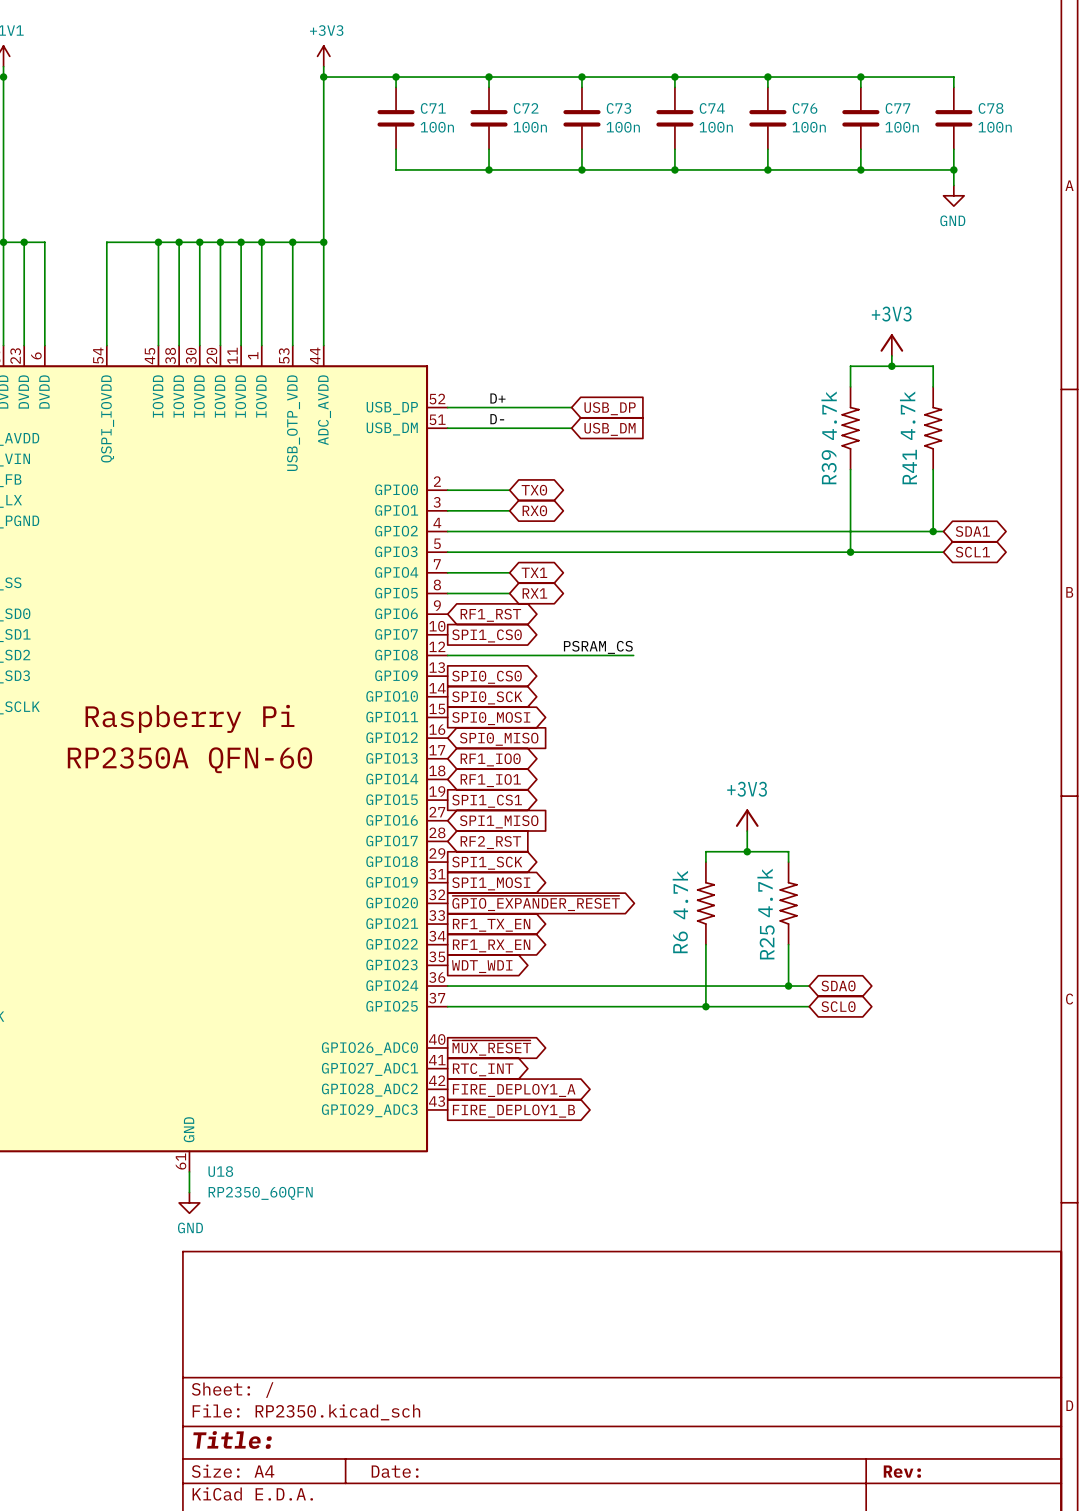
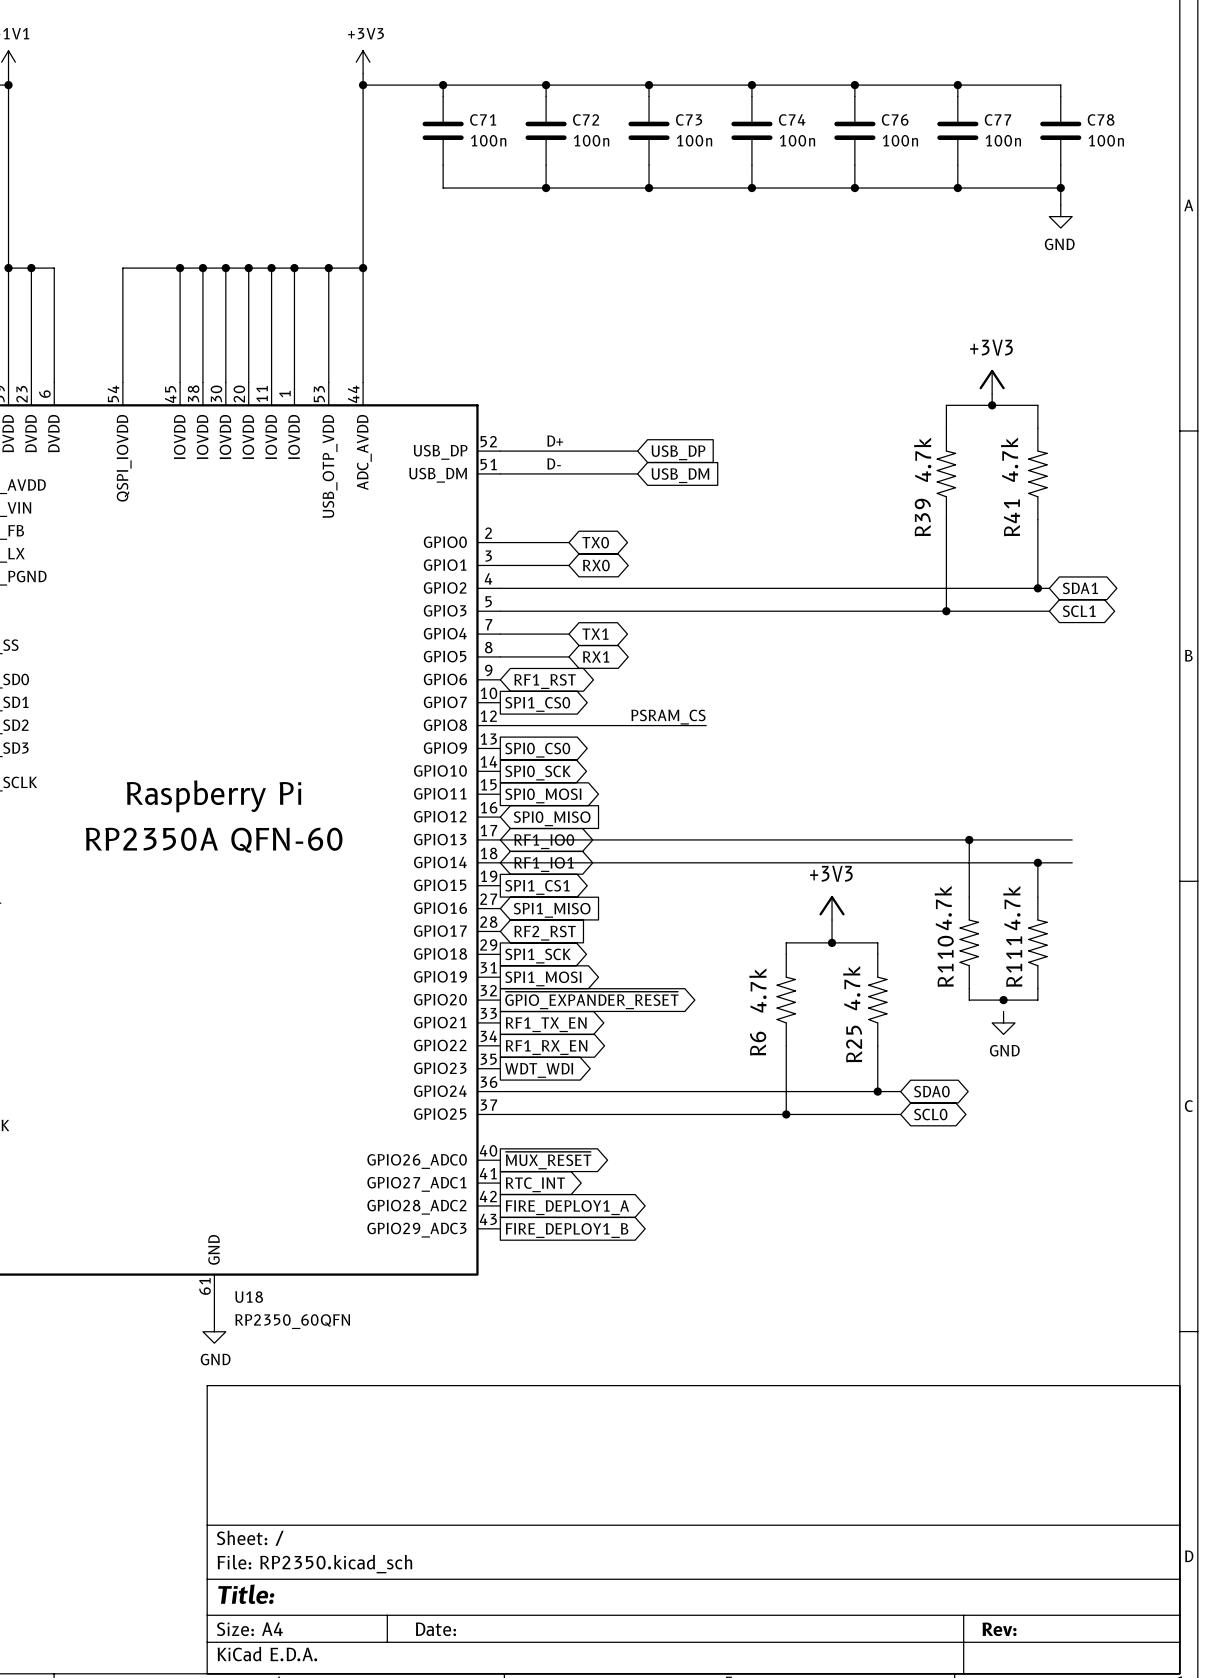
wire: none -> (500, 839) (1072, 839)
wire: none -> (969, 839) (969, 897)
junction: none -> (969, 839)
wire: none -> (500, 862) (1072, 862)
wire: none -> (1037, 862) (1037, 897)
junction: none -> (1037, 862)
R110: none -> 4.7k (969, 942)
R111: none -> 4.7k (1037, 942)
wire: none -> (969, 988) (969, 1000) (1037, 1000) (1037, 988)
junction: none -> (1003, 1000)
power symbol: none -> GND (1003, 1022)

